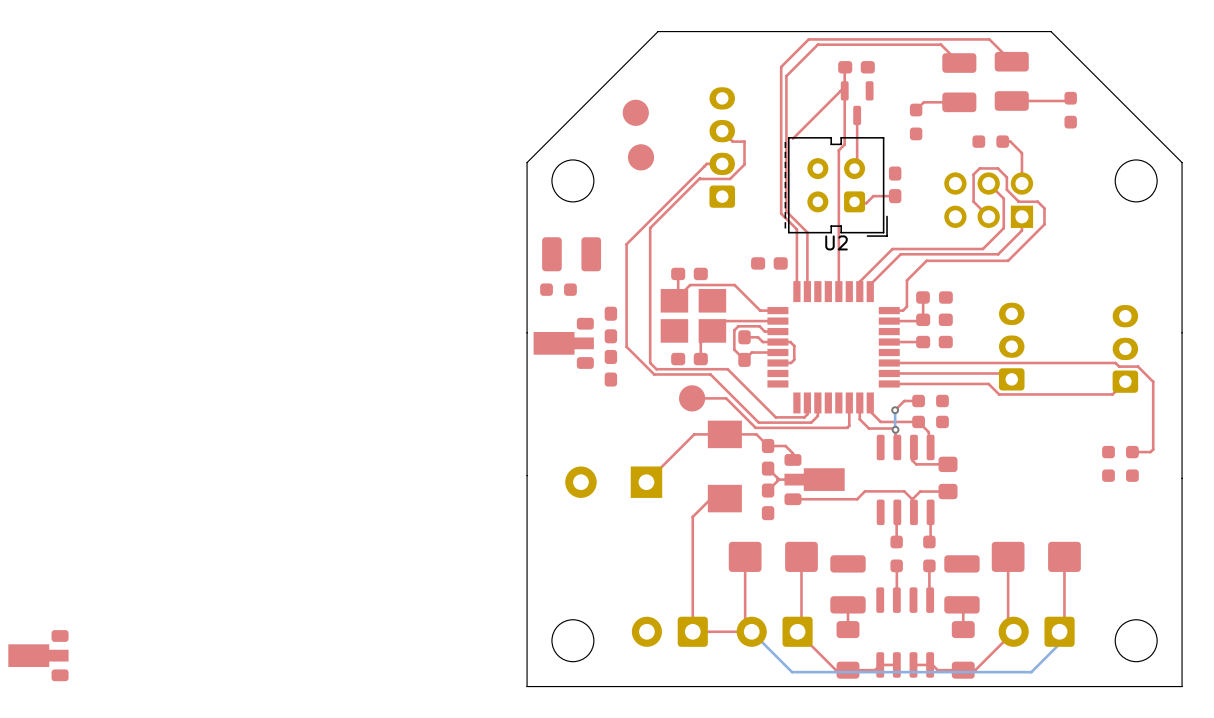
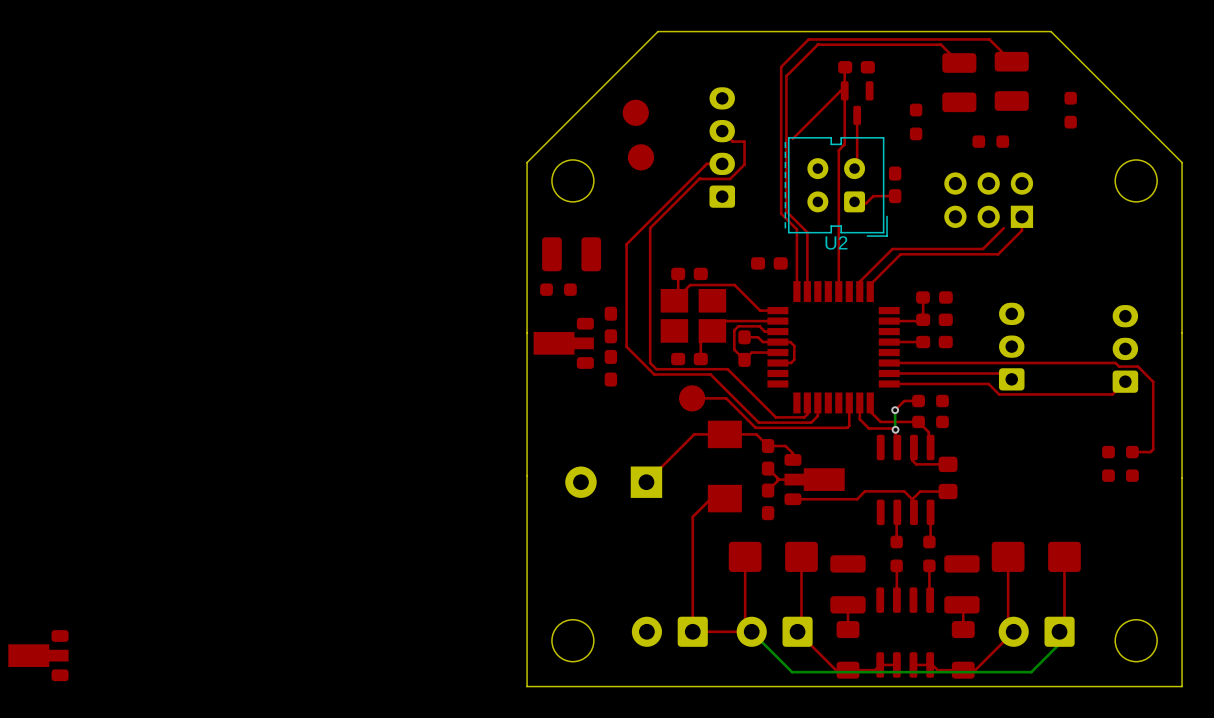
top track: (1070, 98) (1067, 101) (1011, 101) -> none
top track: (959, 102) (923, 102) (916, 110) -> none
top track: (1002, 141) (1010, 141) (1021, 153) (1021, 183) -> none
top track: (988, 183) (1003, 198) (1003, 228) -> none
top track: (988, 216) (973, 201) (973, 174) (979, 168) (997, 168) (1006, 177) (1006, 189) (1018, 201) (1037, 201) (1044, 208) (1044, 224) (1008, 260) (926, 260) (906, 280) (906, 306) (903, 310) (889, 310) -> none

